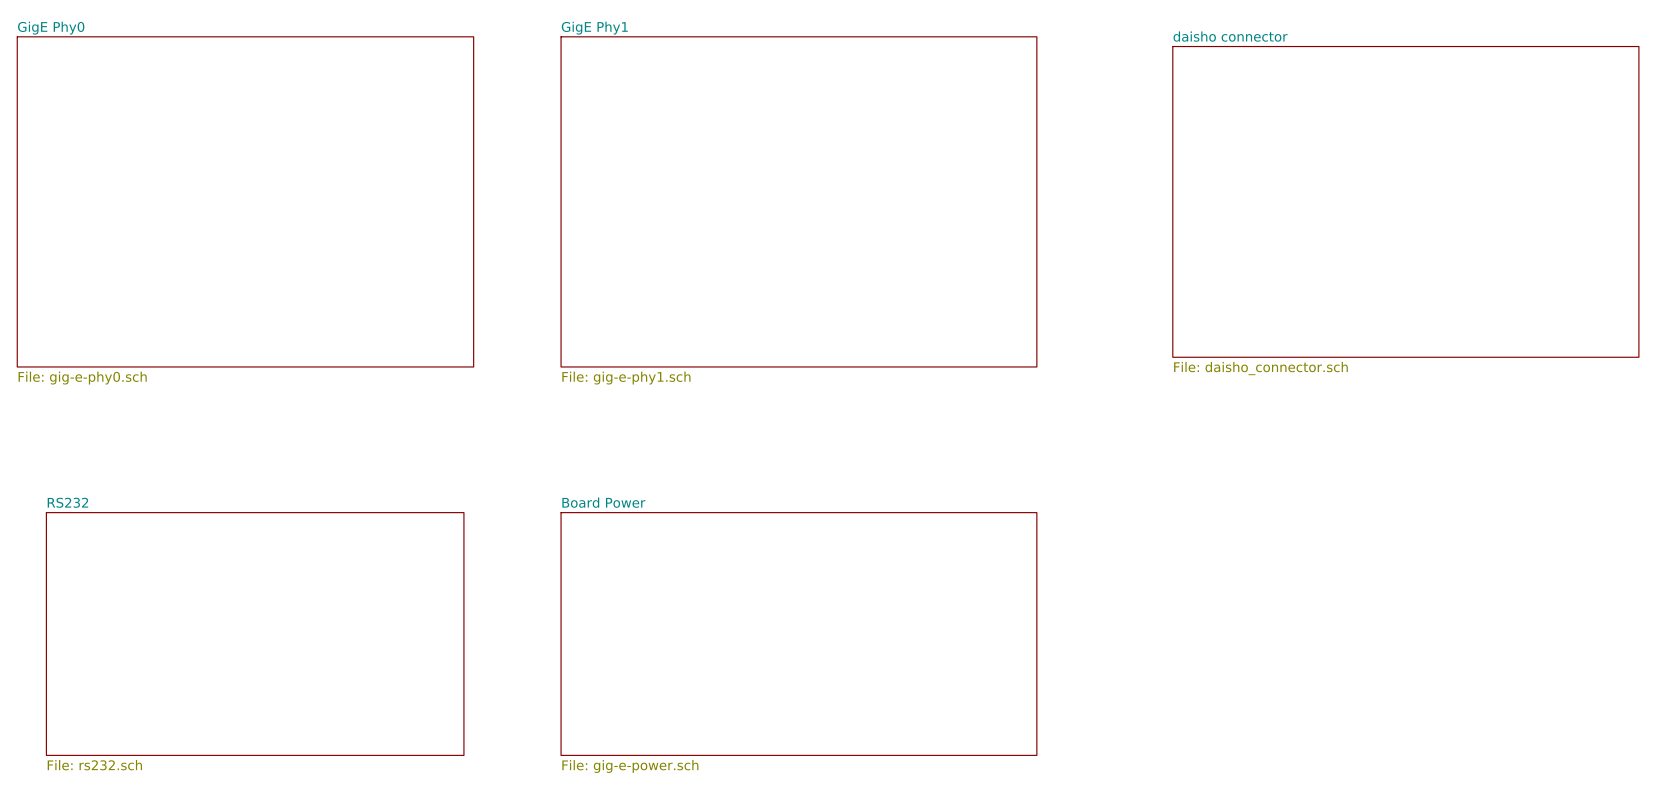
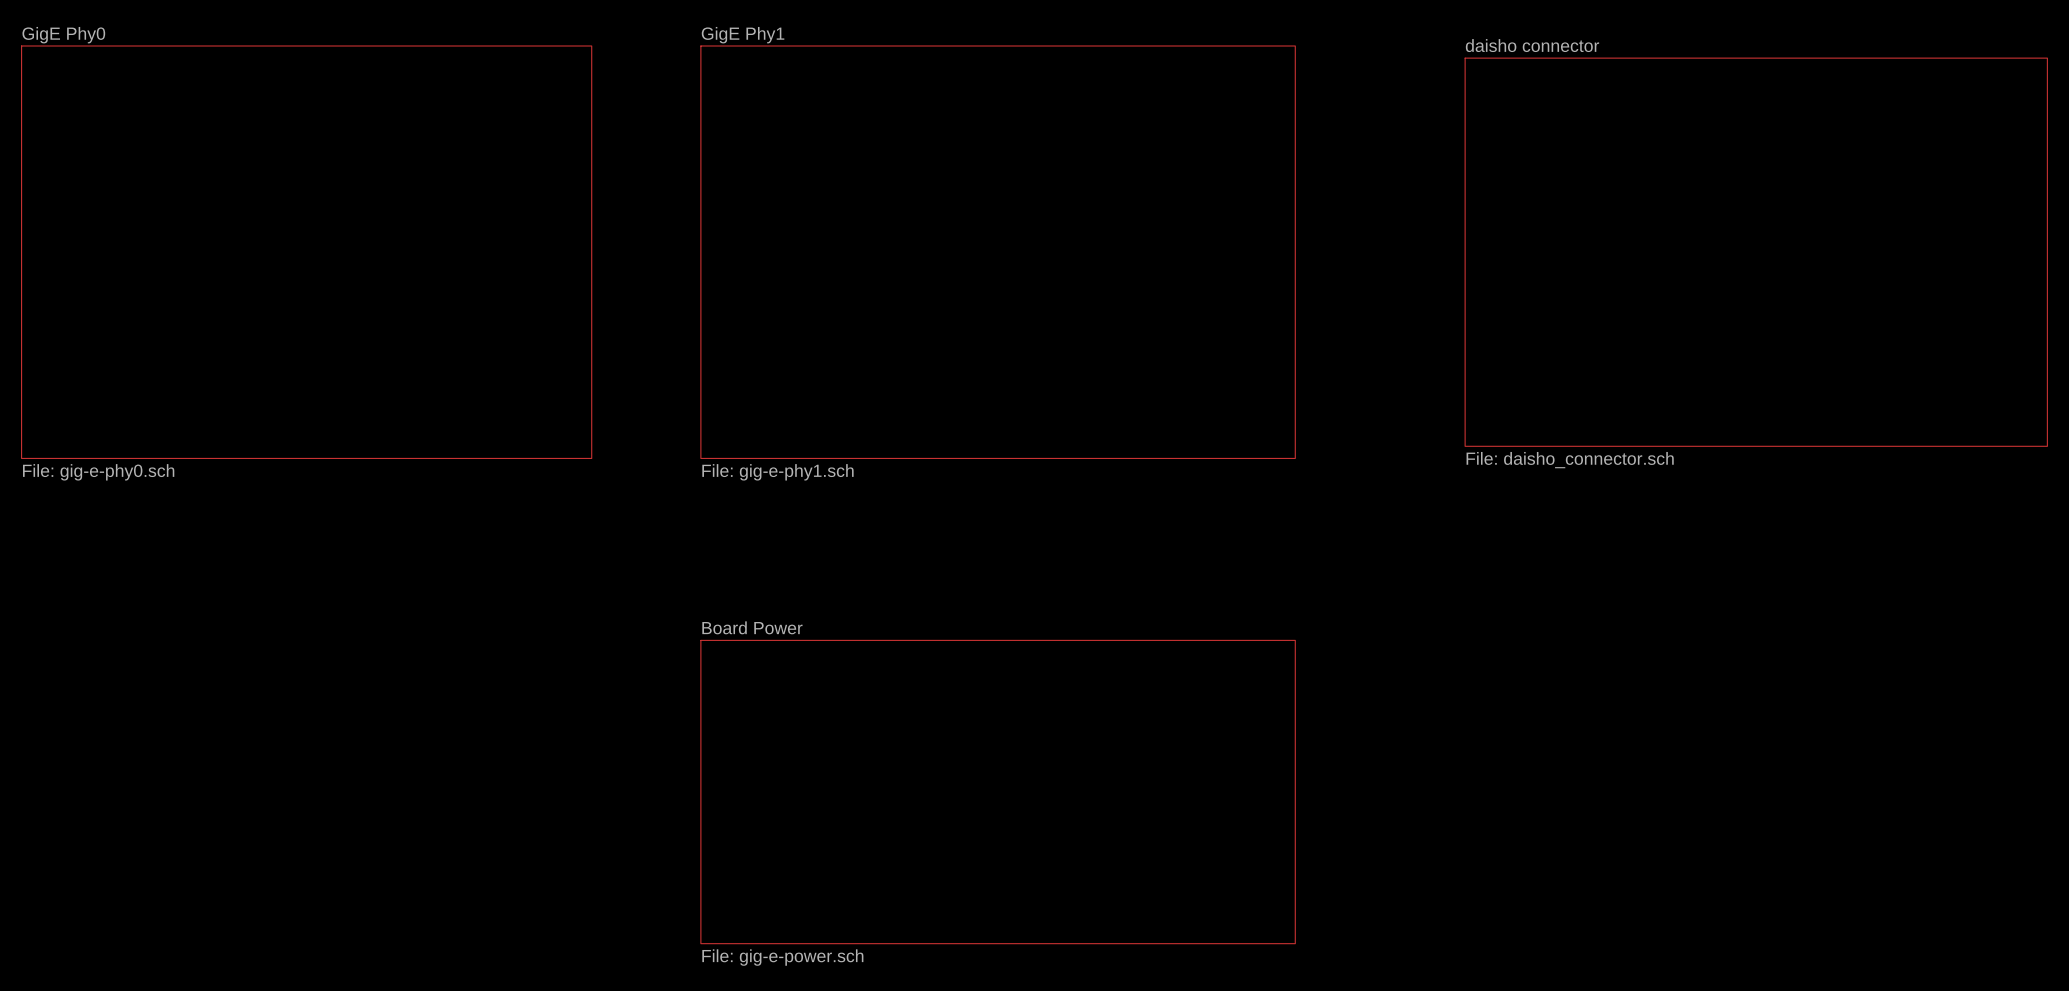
sheet RS232: File: rs232.sch (255, 634) -> none

